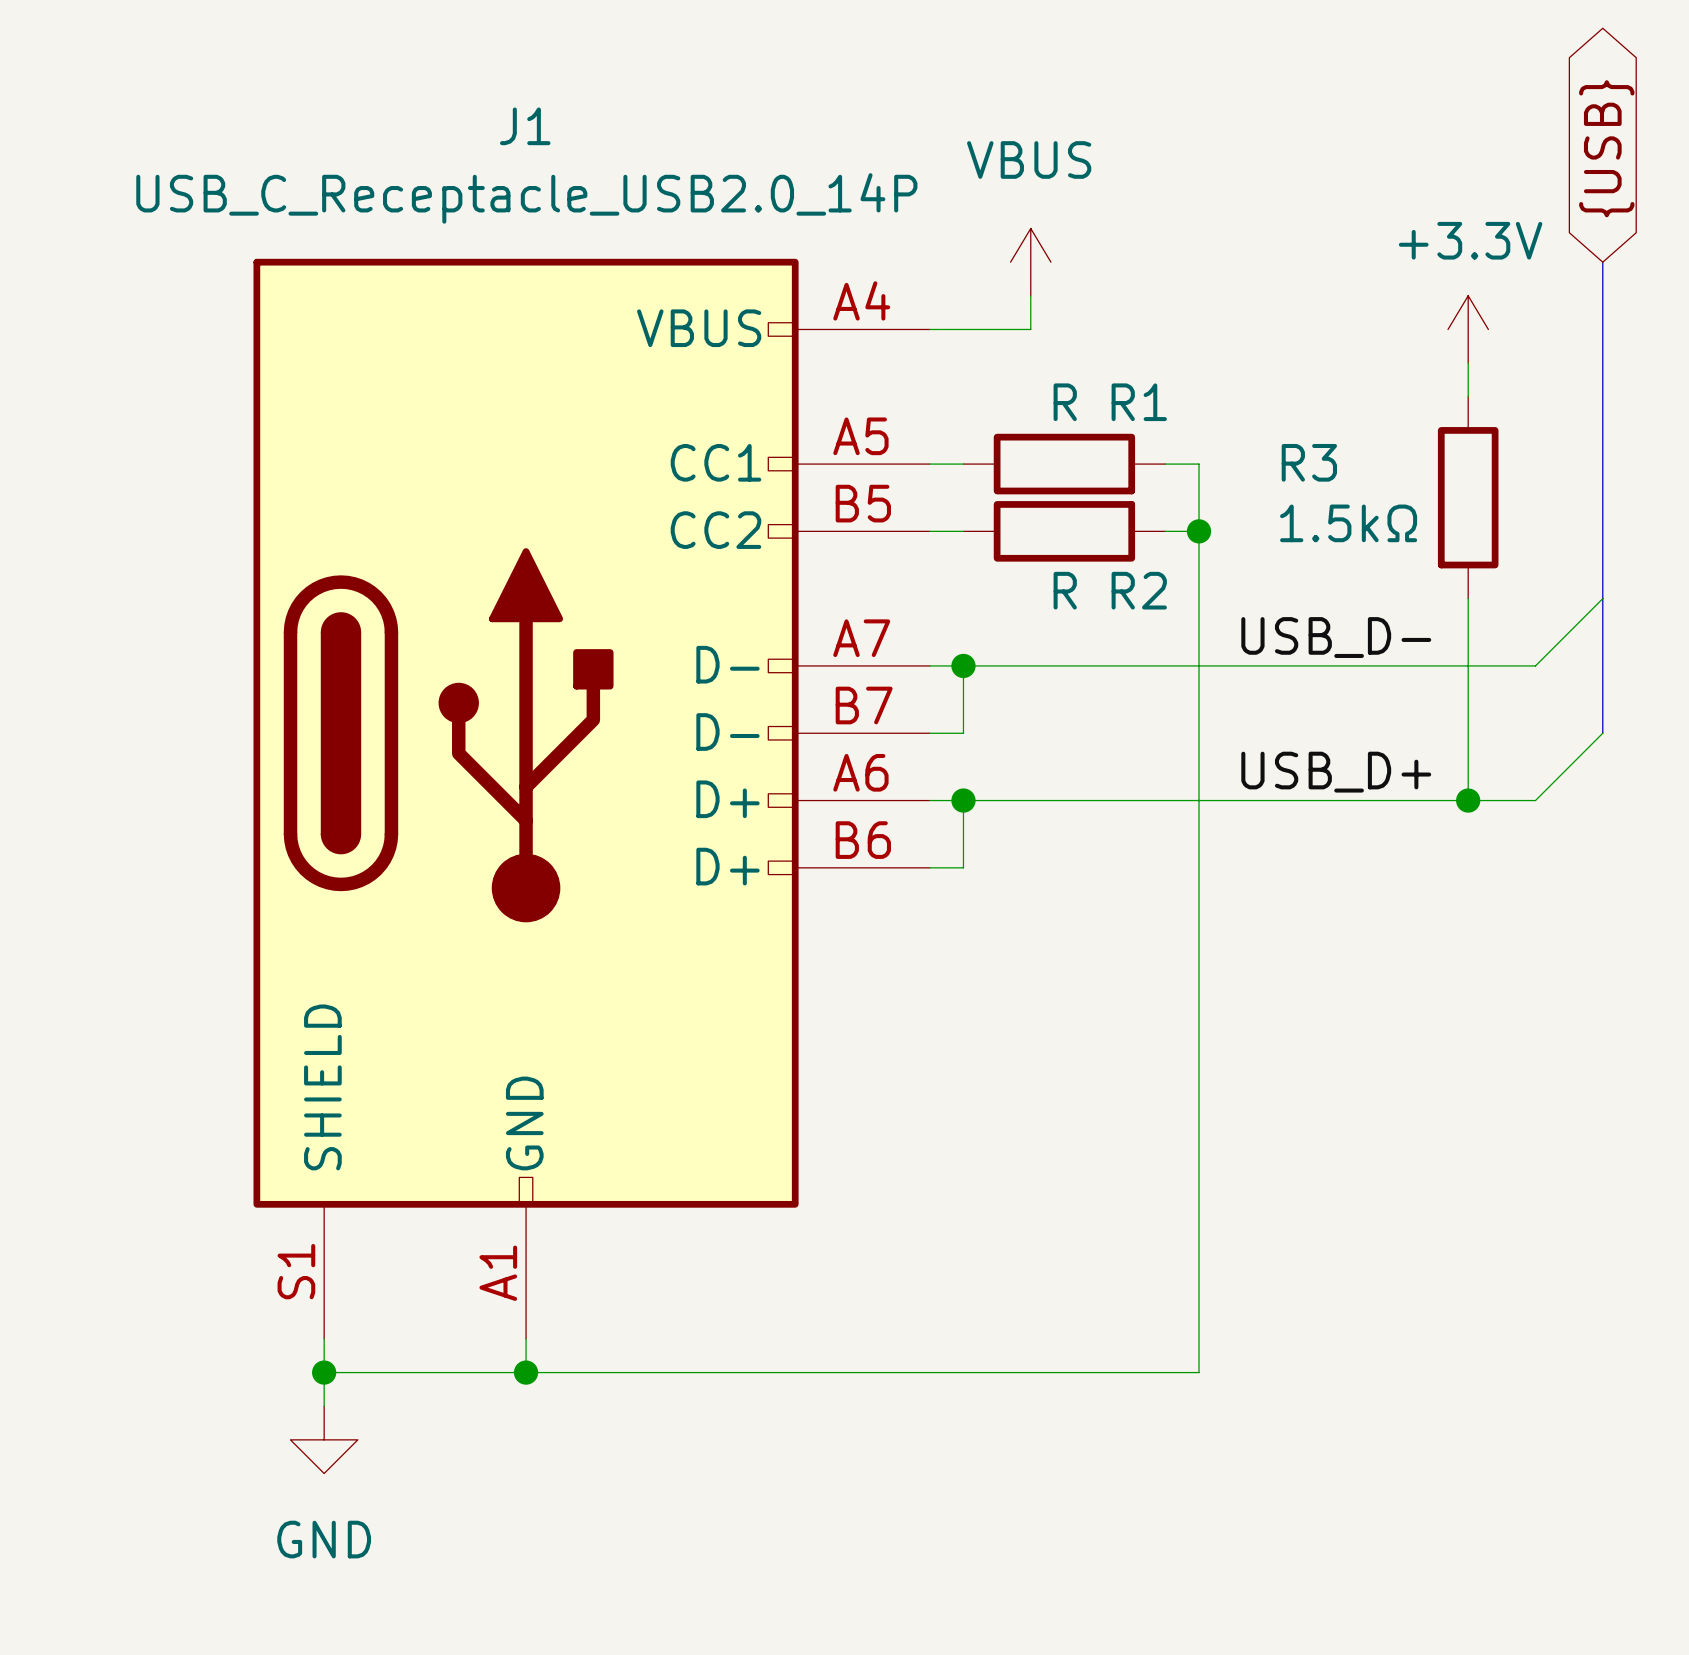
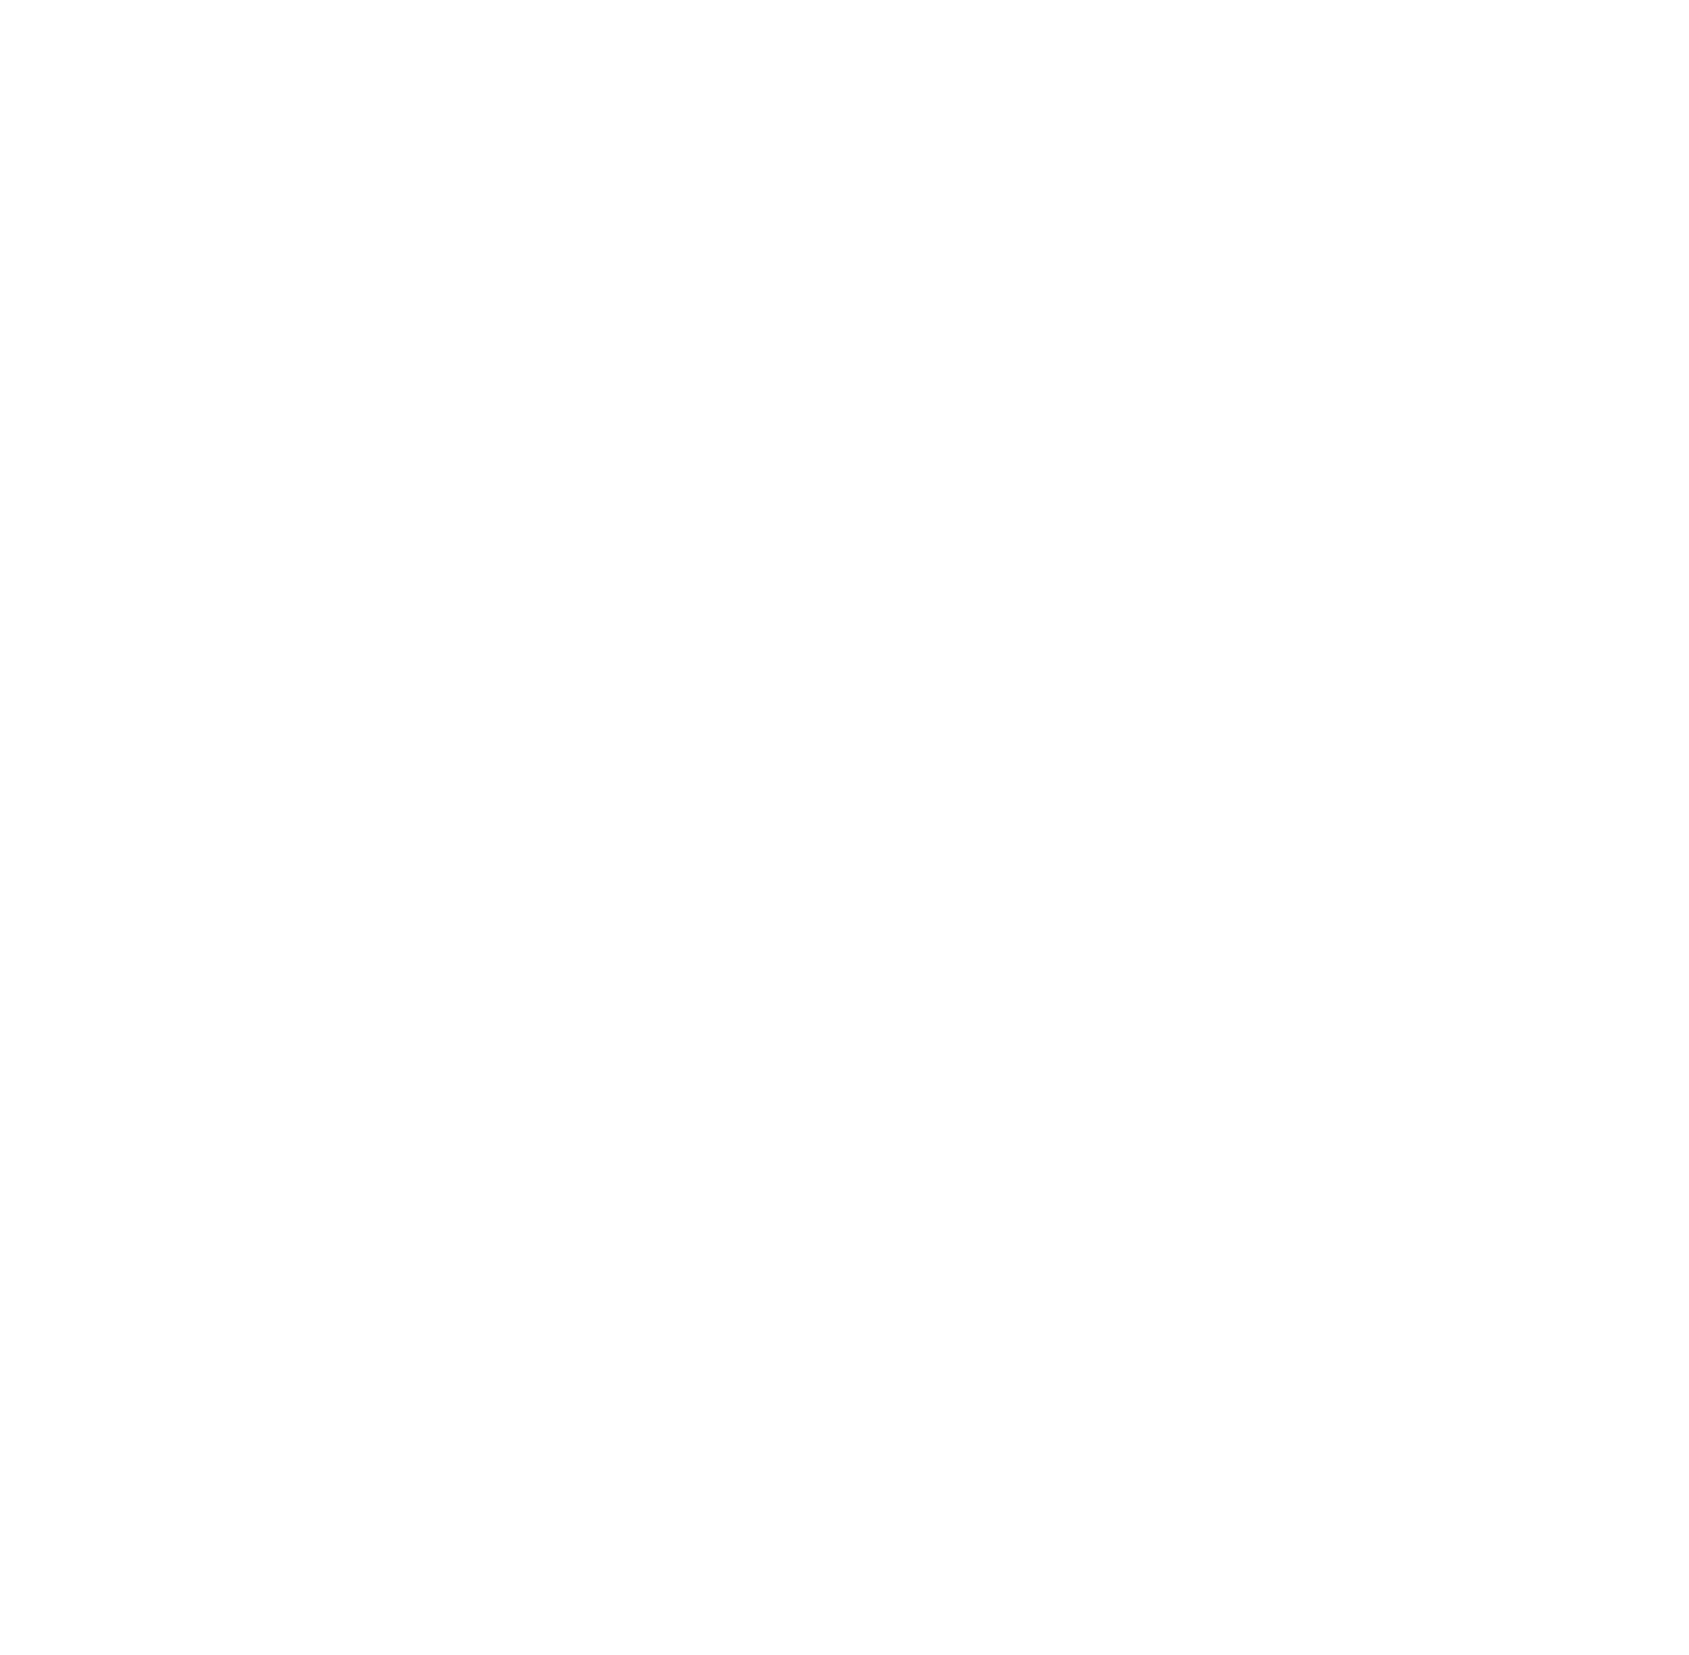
global label: {USB} (1606, 148) -> none
power symbol: VBUS (1030, 262) -> none
bus: (1602, 262) (1602, 733) -> none
wire: (1030, 295) (1030, 329) (929, 329) -> none
power symbol: +3.3V (1468, 329) -> none
wire: (1468, 363) (1468, 396) -> none
wire: (929, 464) (963, 464) -> none
R1: R (1064, 464) -> none
wire: (1165, 464) (1199, 464) (1199, 1372) (324, 1372) -> none
R3: 1.5kΩ (1468, 497) -> none
wire: (929, 531) (963, 531) -> none
R2: R (1064, 531) -> none
wire: (1165, 531) (1199, 531) -> none
junction: (1199, 531) -> none
wire: (1468, 598) (1468, 800) -> none
wire: (1602, 598) (1535, 665) (929, 665) -> none
label: USB_D- (1336, 637) -> none
wire: (963, 665) (963, 733) (929, 733) -> none
junction: (963, 665) -> none
wire: (1602, 733) (1535, 800) (929, 800) -> none
label: USB_D+ (1336, 772) -> none
J1: USB_C_Receptacle_USB2.0_14P (591, 798) -> none
wire: (963, 800) (963, 867) (929, 867) -> none
junction: (963, 800) -> none
junction: (1468, 800) -> none
wire: (324, 1338) (324, 1406) -> none
wire: (526, 1338) (526, 1372) -> none
junction: (324, 1372) -> none
junction: (526, 1372) -> none
power symbol: GND (324, 1439) -> none

